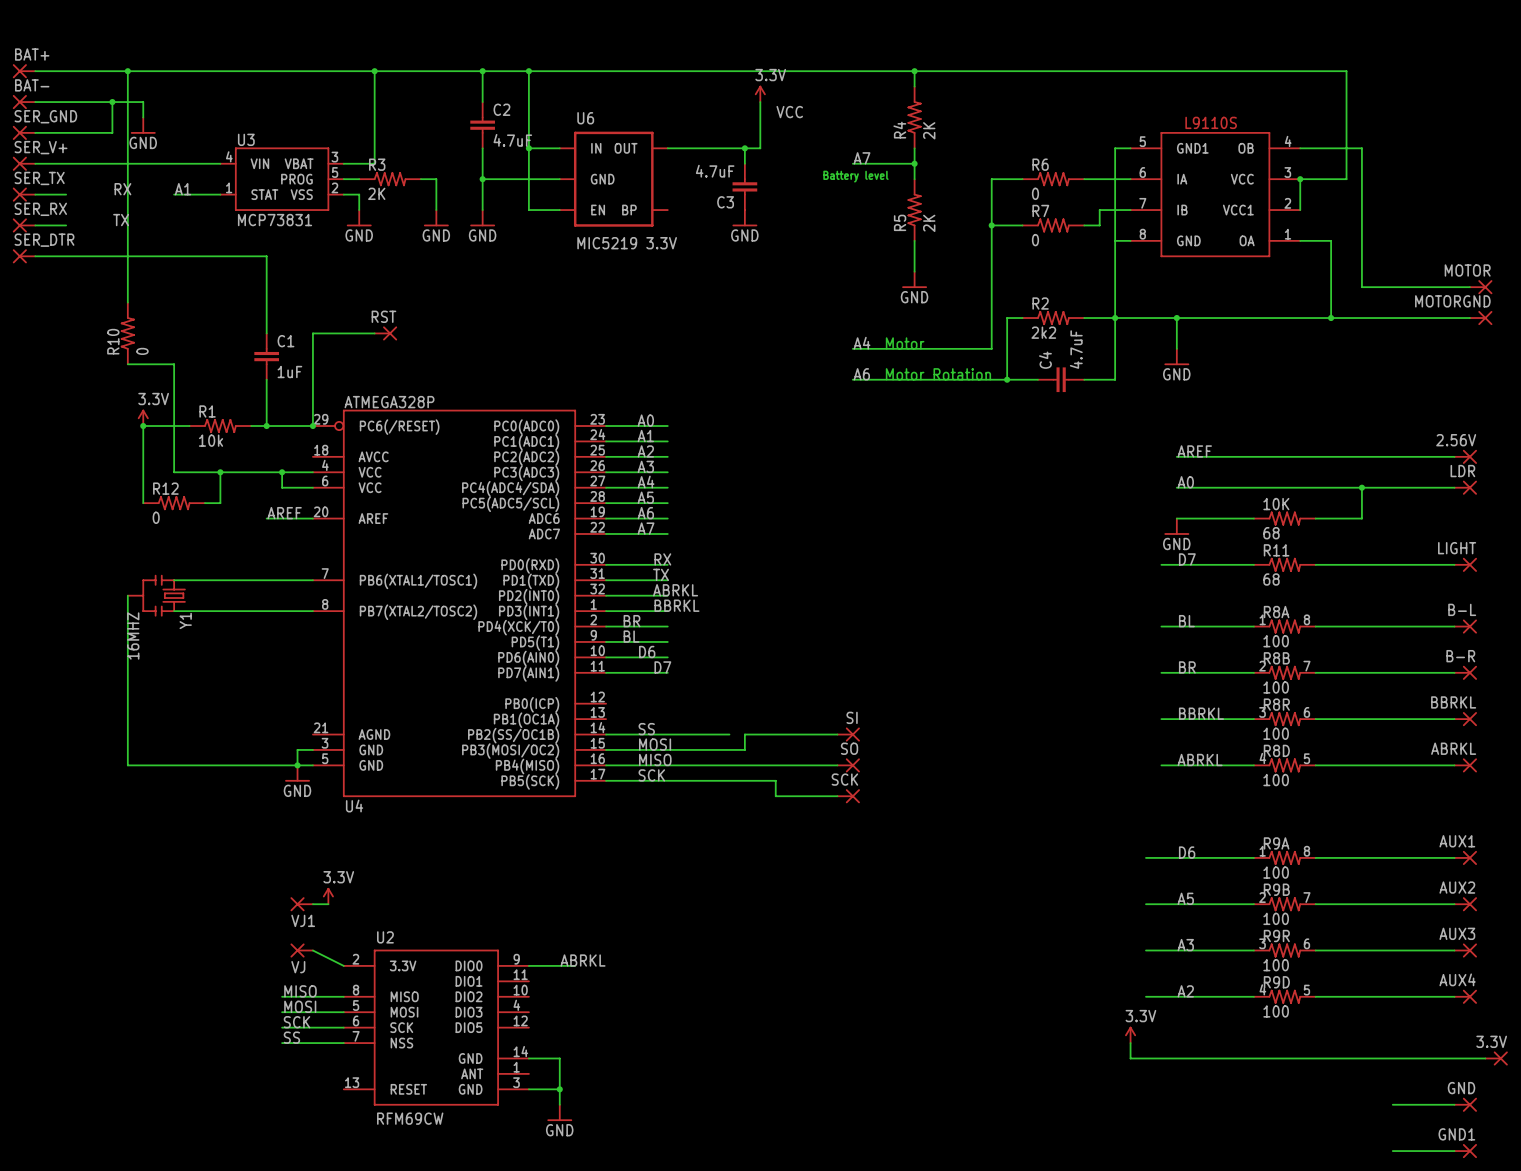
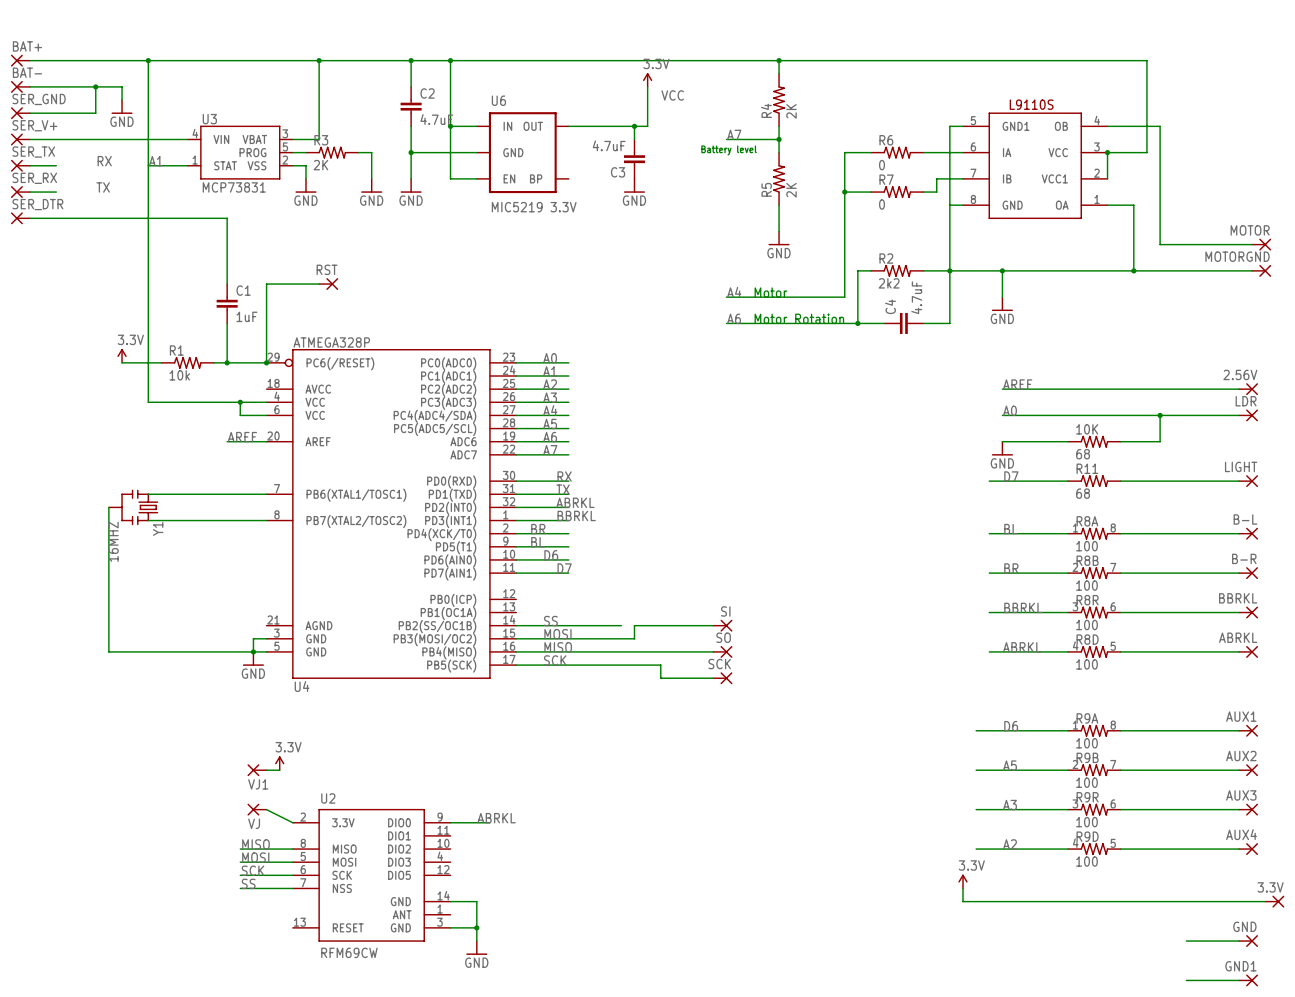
wire: (127, 71) (127, 302) -> none
junction: (127, 71) -> none
junction: none -> (148, 60)
R10: 0 (127, 333) -> none
wire: (127, 364) (174, 364) -> (148, 60) (148, 310)
wire: (143, 426) (143, 503) -> none
junction: (143, 426) -> none
wire: (220, 472) (220, 503) (204, 503) -> none
junction: (220, 472) -> none
R12: 0 (174, 503) -> none

